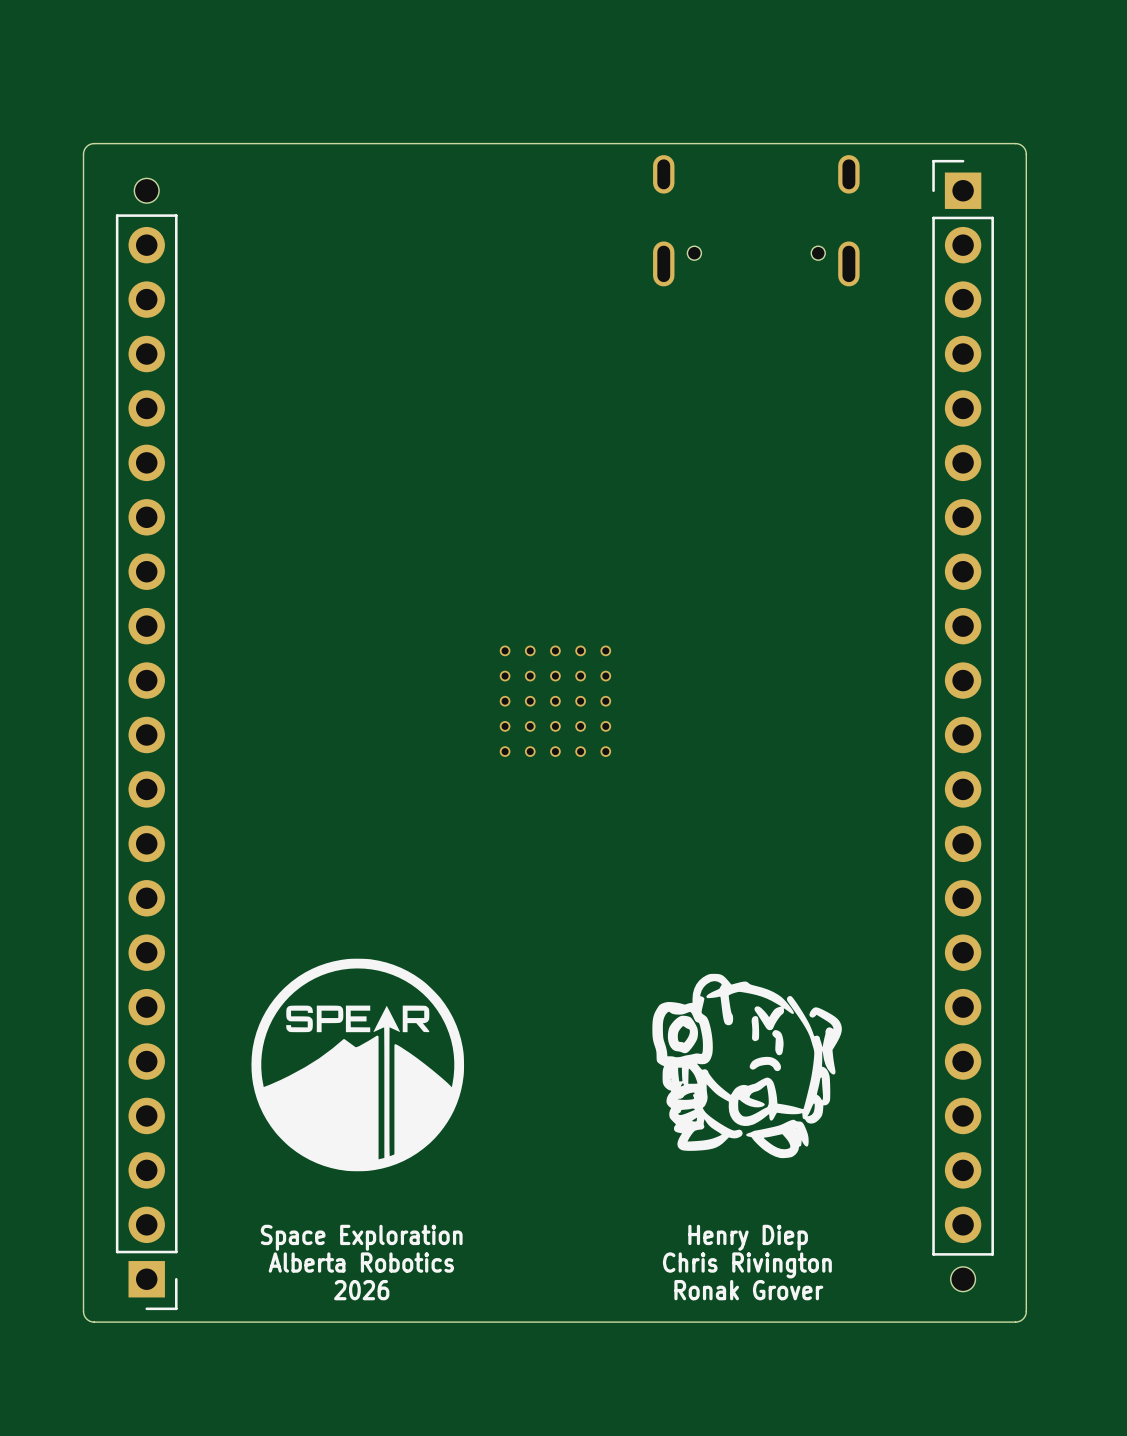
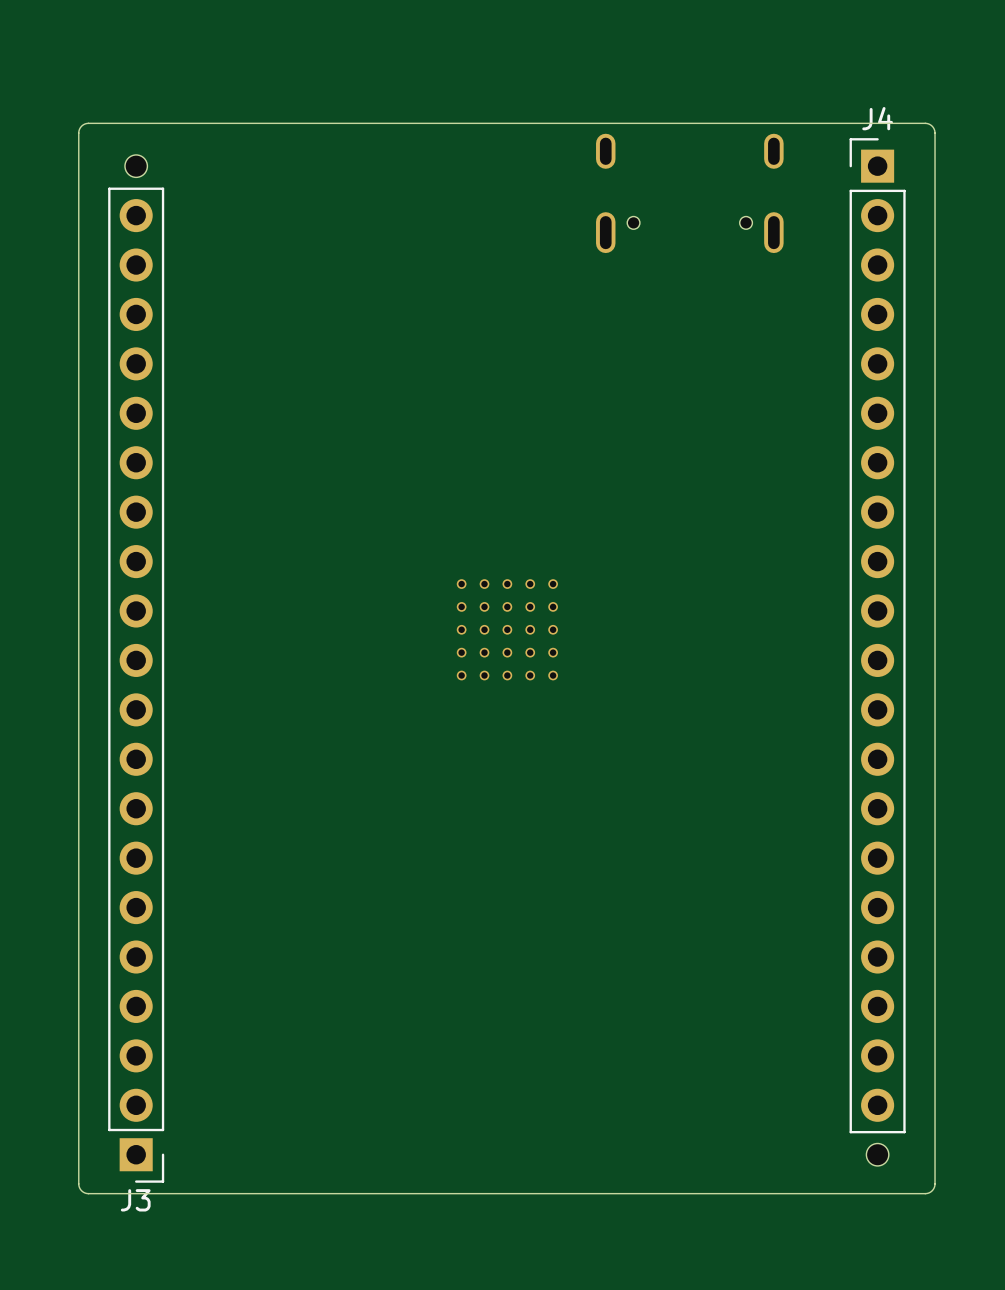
J4 name: none -> J4 (877, 118)
drawing: [251, 958, 465, 1172] -> none
drawing: [652, 973, 842, 1159] -> none
text: Space Exploration (361, 1237) -> none
text: Henry Diep (748, 1237) -> none
text: Alberta Robotics (361, 1262) -> none
text: Chris Rivington (747, 1265) -> none
text: 2026 (361, 1290) -> none
text: Ronak Grover (748, 1290) -> none
J3 name: none -> J3 (135, 1200)

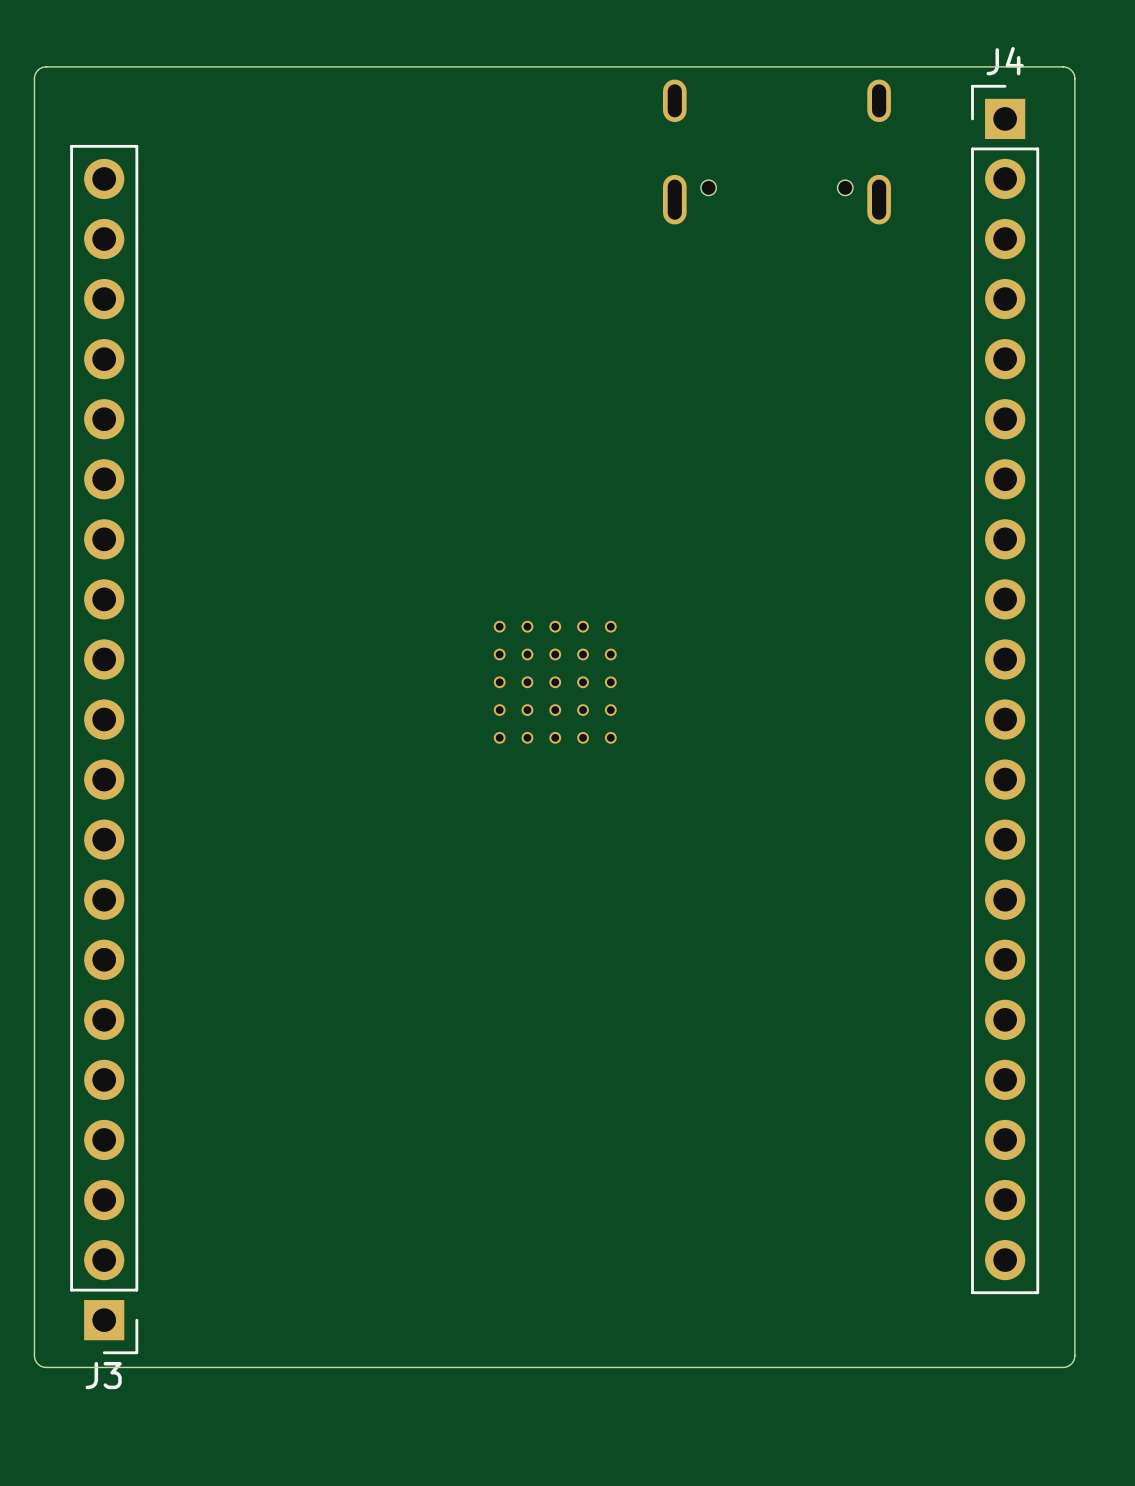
part: (136, 166) -> none
part: (877, 1154) -> none

